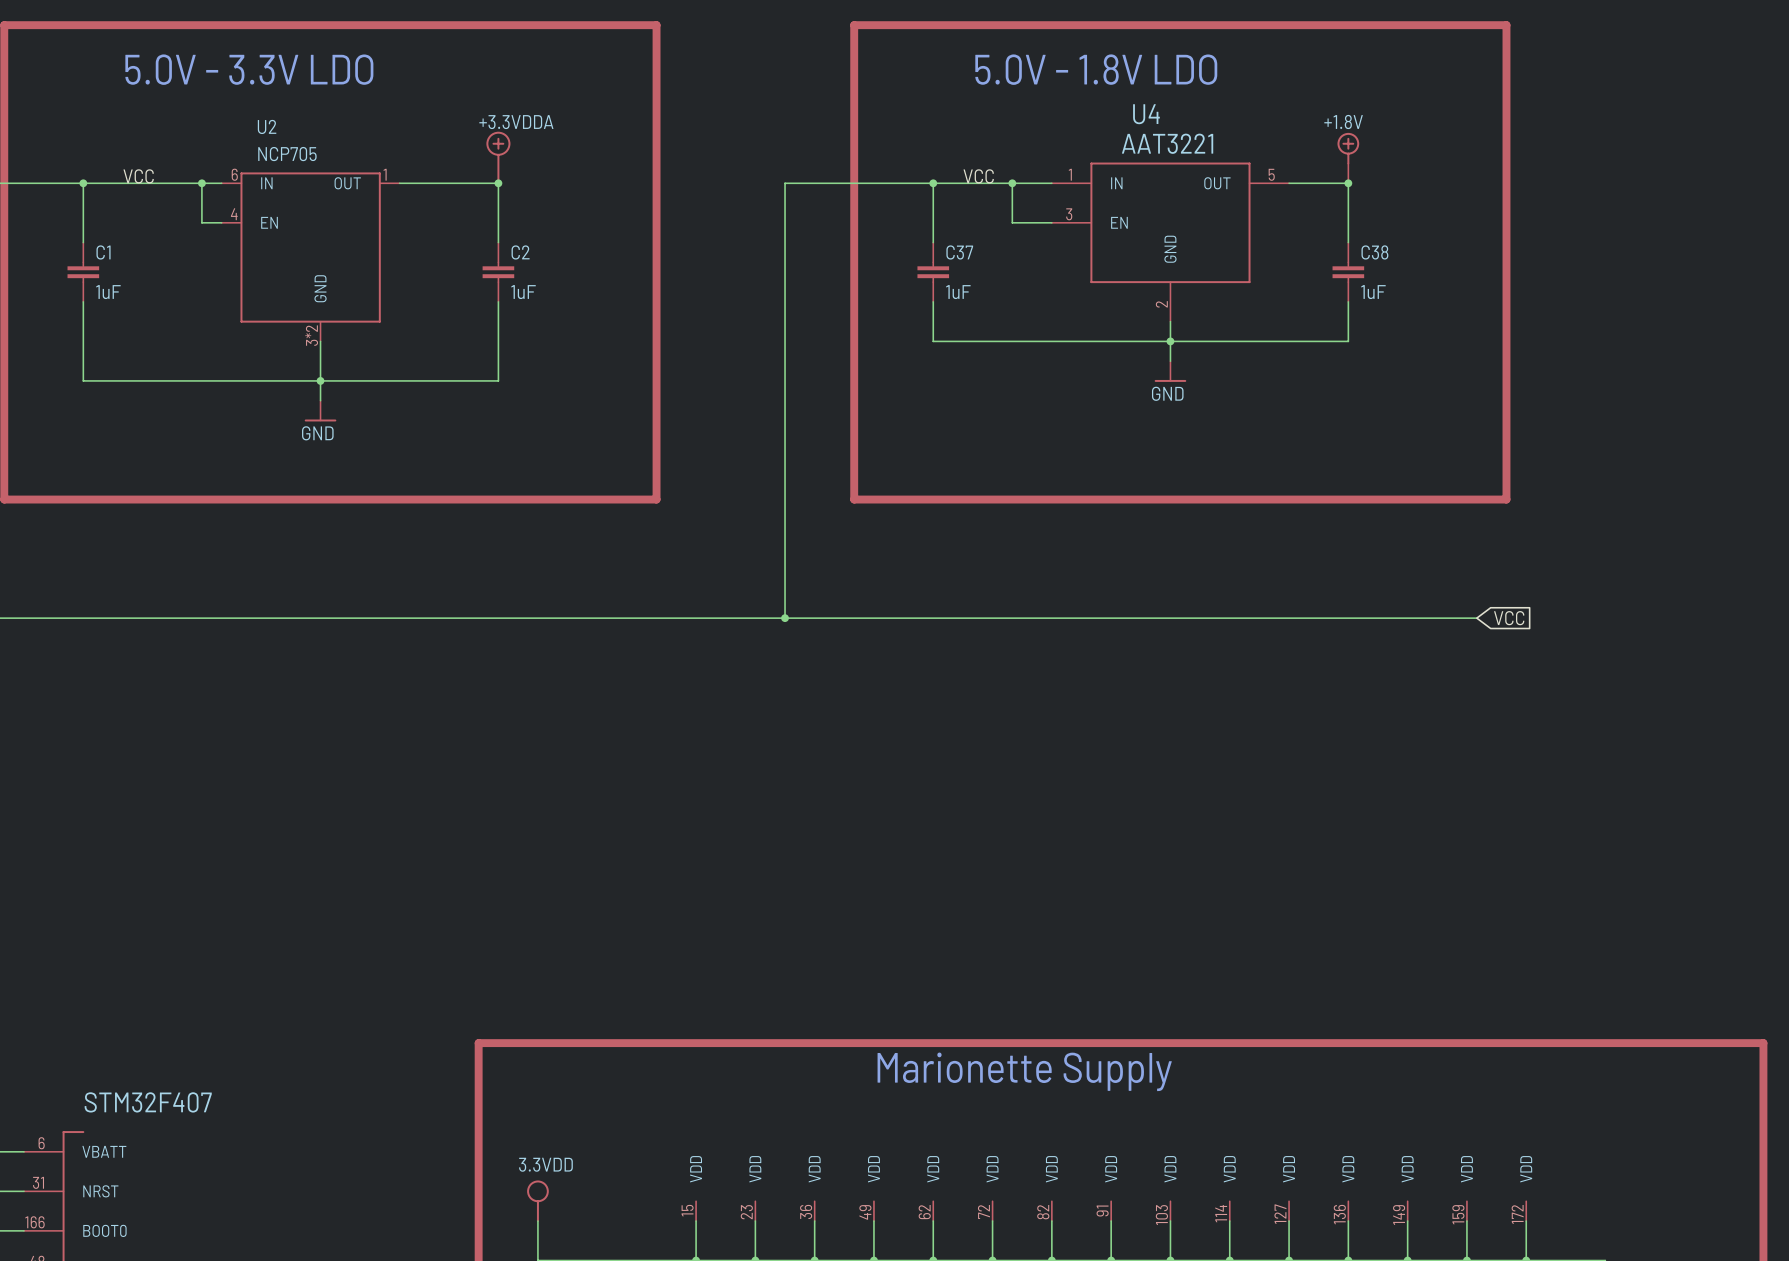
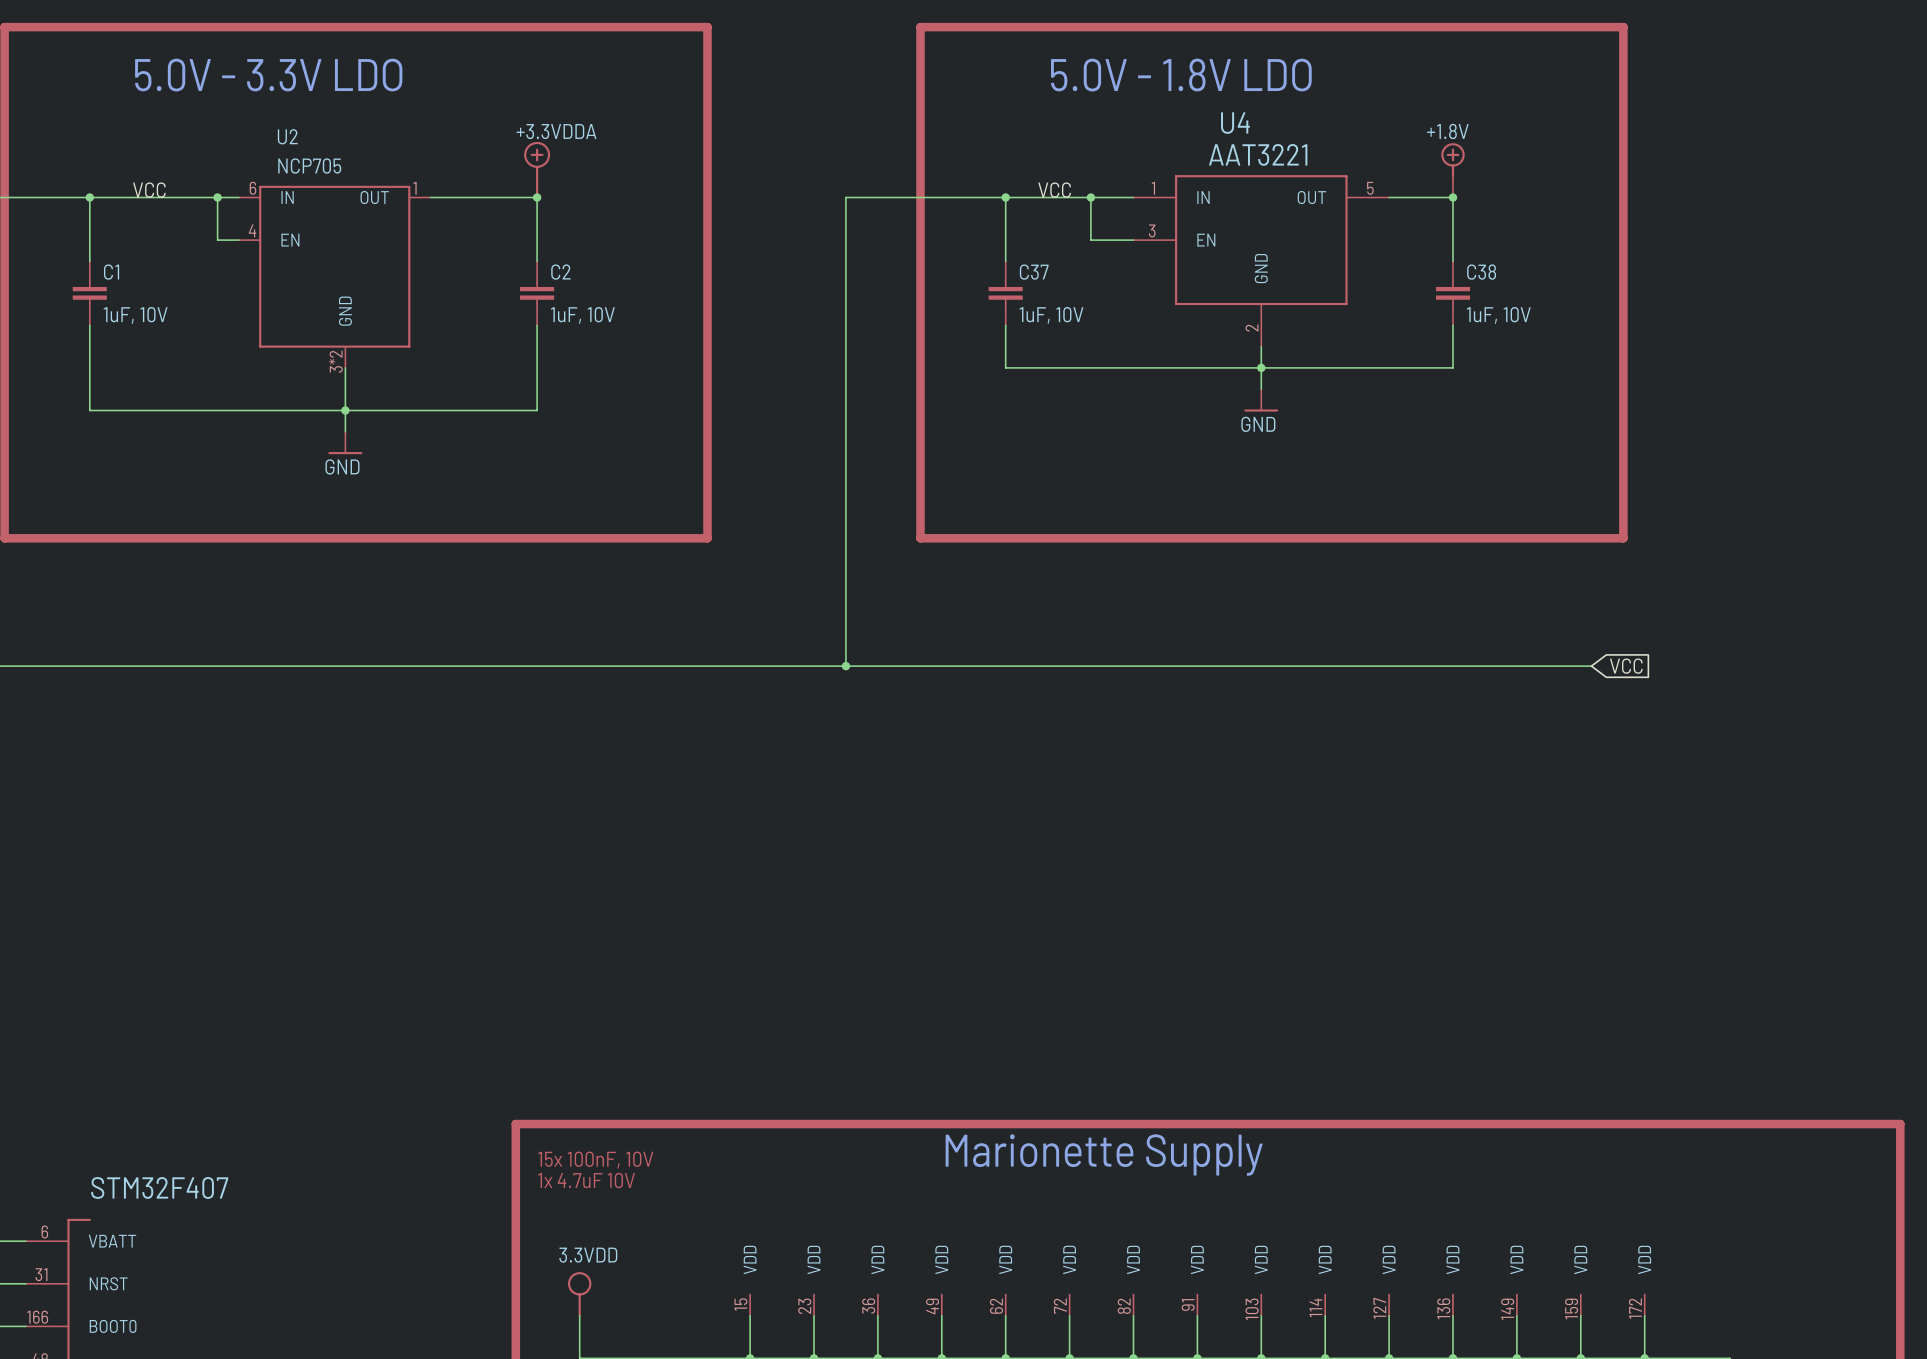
C1 value: 1uF (108, 292) -> 1uF, 10V (135, 315)
C2 value: 1uF (523, 292) -> 1uF, 10V (582, 315)
C37 value: 1uF (958, 292) -> 1uF, 10V (1051, 315)
C38 value: 1uF (1373, 292) -> 1uF, 10V (1498, 315)
text: none -> 15x 100nF, 10V (595, 1159)
text: none -> 1x 4.7uF 10V (586, 1180)

